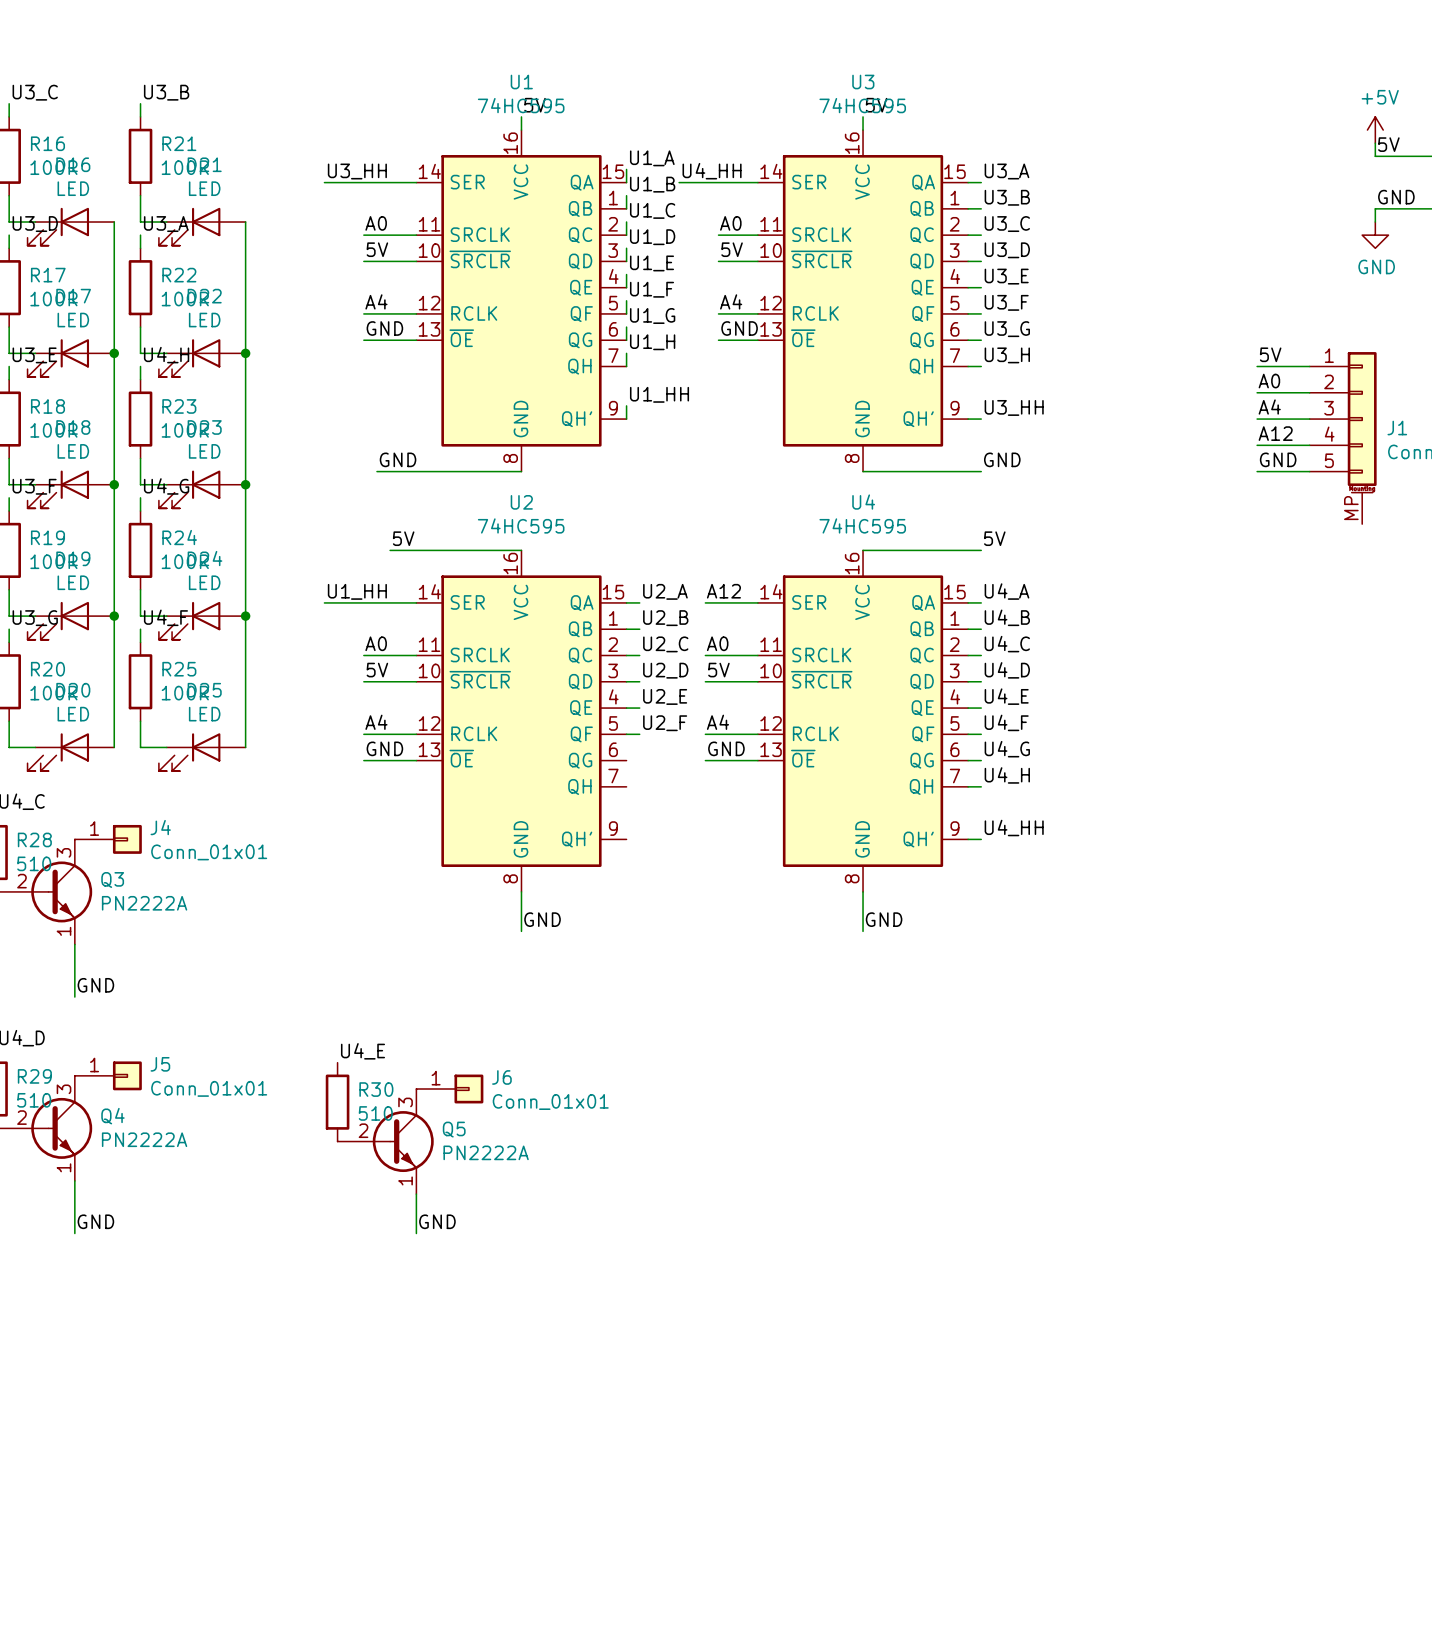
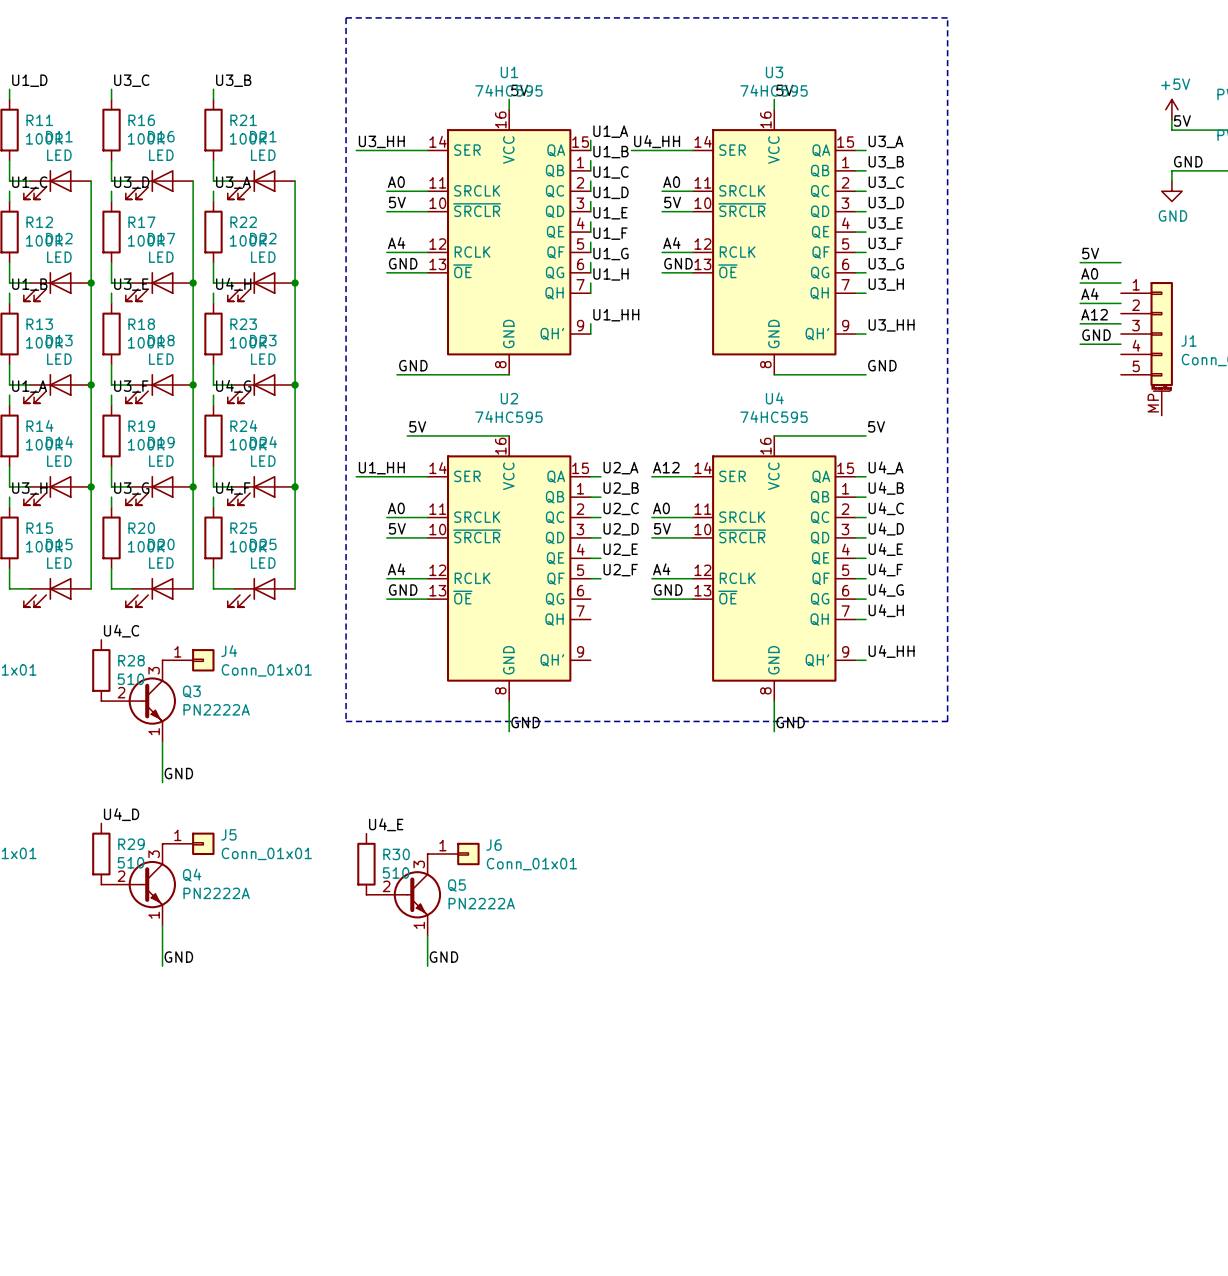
line: none -> (346, 17) (346, 721) (947, 721) (947, 17) (346, 17)
label position: 5V (1270, 354) -> 5V (1090, 253)
wire: (1257, 366) (1309, 366) -> (1080, 262) (1120, 262)
label position: A0 (1269, 381) -> A0 (1089, 273)
wire: (1257, 392) (1309, 392) -> (1080, 283) (1120, 283)
label position: A4 (1269, 407) -> A4 (1089, 294)
wire: (1257, 419) (1309, 419) -> (1080, 303) (1120, 303)
label position: A12 (1275, 433) -> A12 (1094, 314)
wire: (1257, 445) (1309, 445) -> (1080, 323) (1120, 323)
label position: GND (1278, 459) -> GND (1096, 335)
wire: (1257, 471) (1309, 471) -> (1080, 344) (1120, 344)

